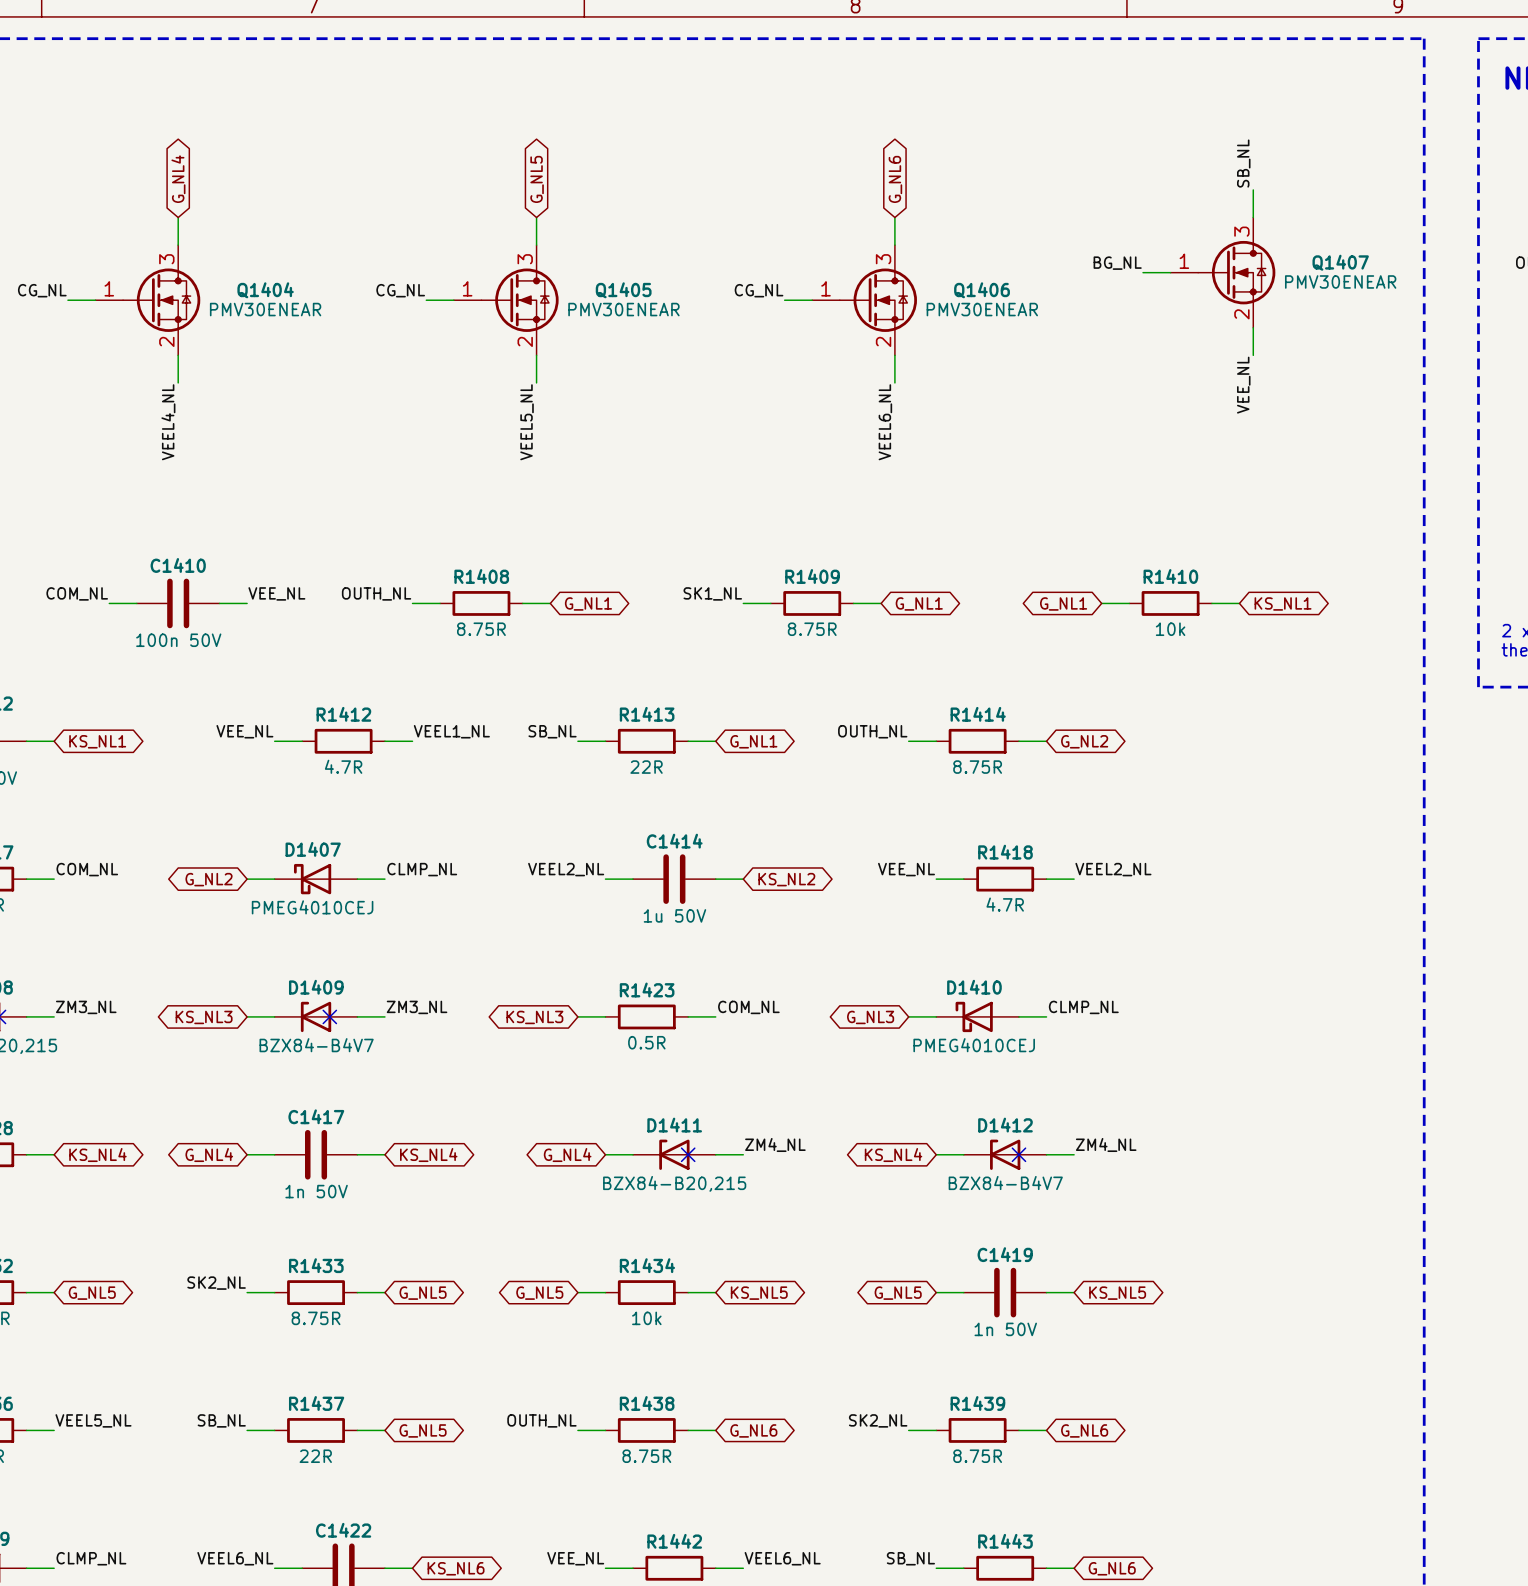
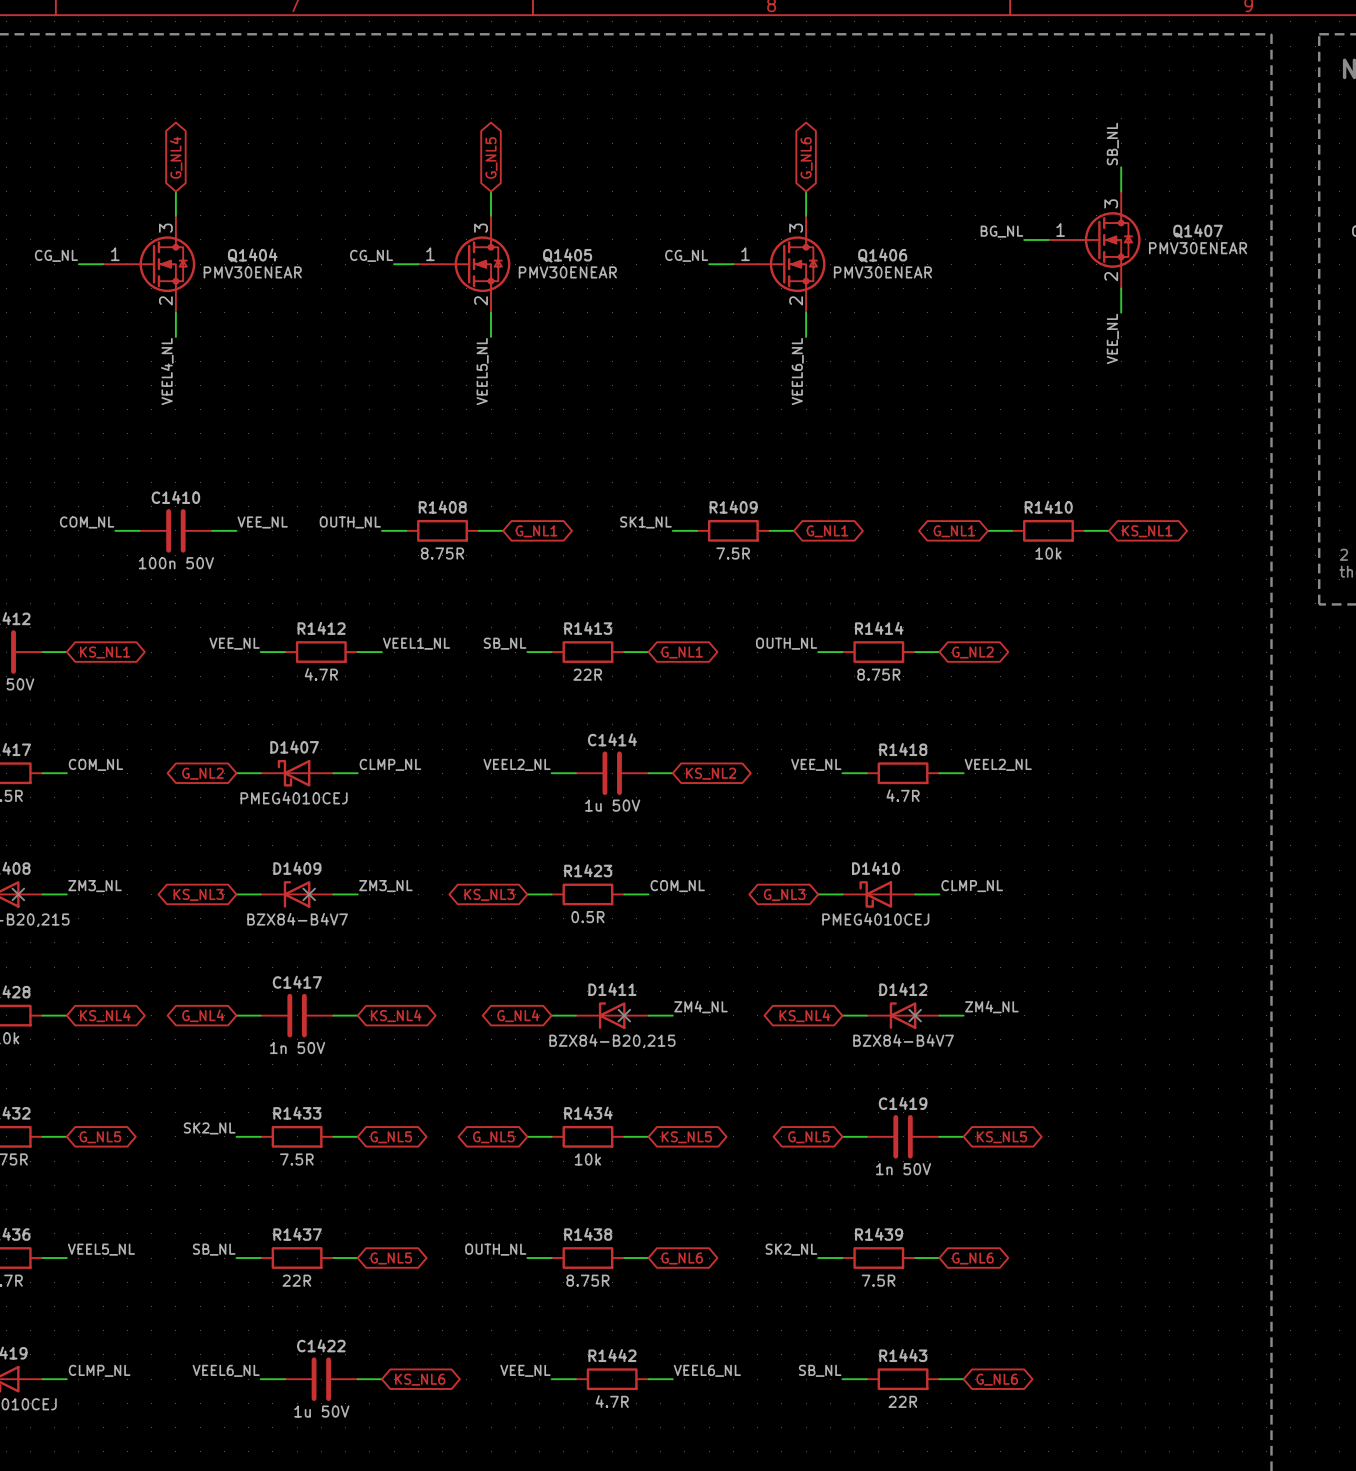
R1409 value: 8.75R (812, 629) -> 7.5R (733, 553)
R1433 value: 8.75R (316, 1318) -> 7.5R (296, 1159)
R1439 value: 8.75R (977, 1456) -> 7.5R (878, 1280)

